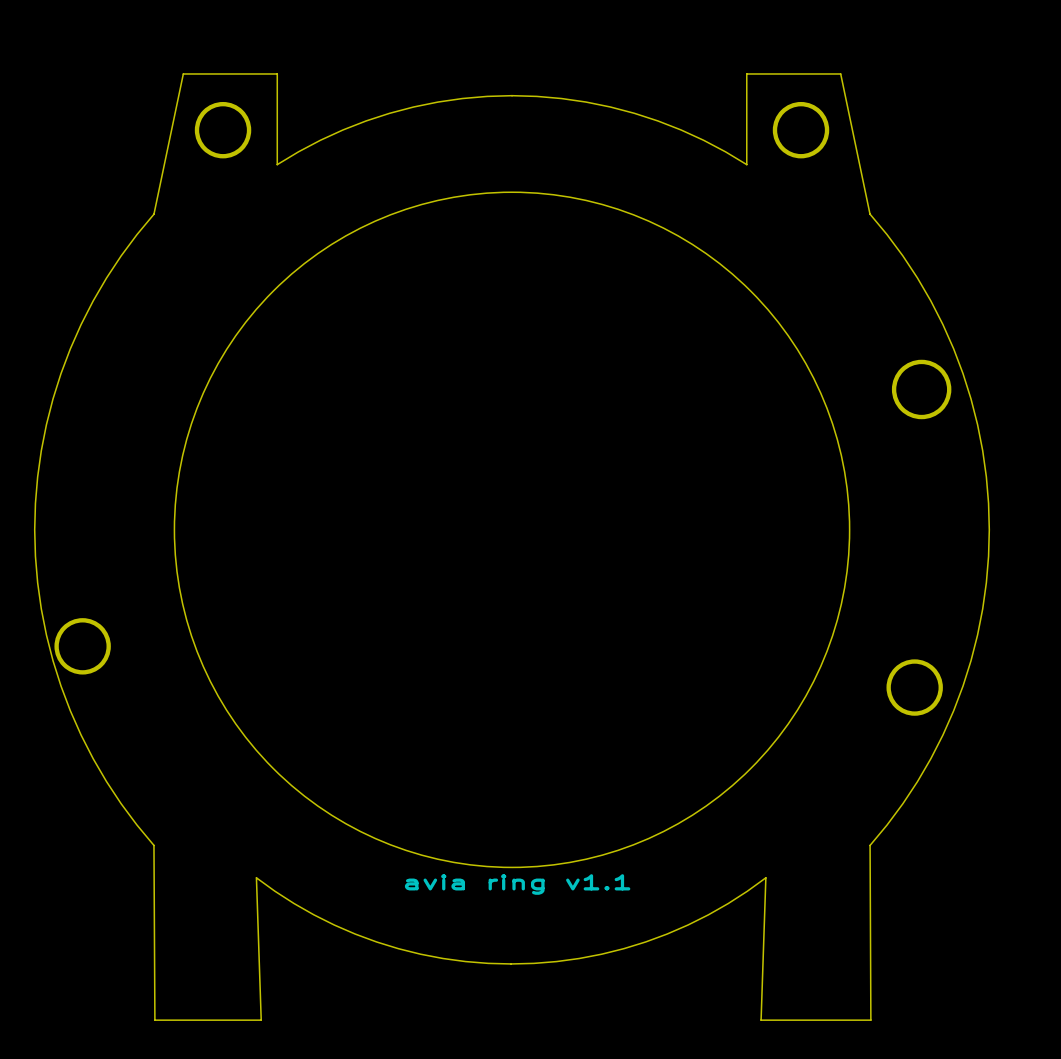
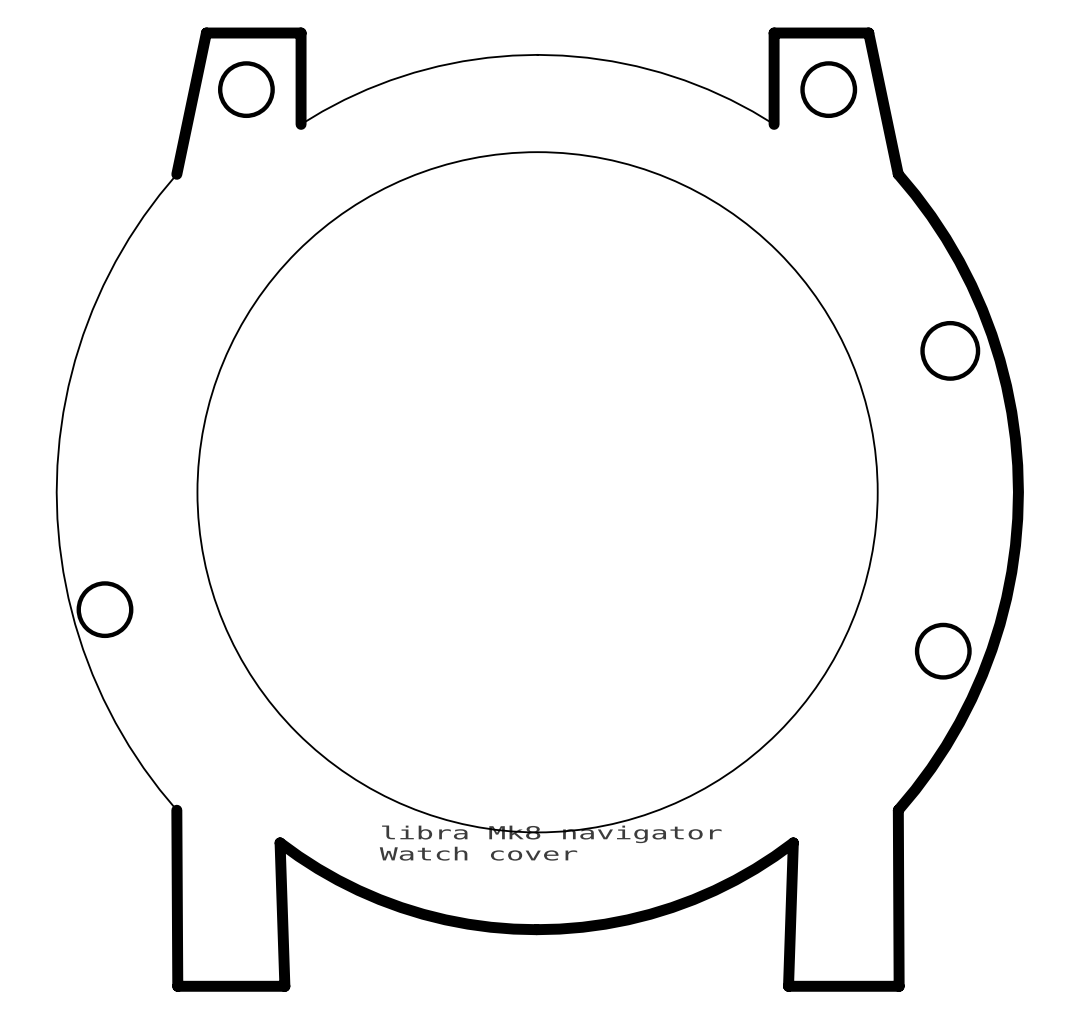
board edge width: thin (277, 164) (277, 73) (183, 73) (153, 214) -> thick (301, 124) (301, 33) (206, 33) (176, 174)
board edge width: thin (746, 164) (746, 73) (840, 73) (870, 214) (917, 277) (942, 324) (970, 398) (982, 450) (988, 503) (988, 556) (982, 608) (971, 660) (953, 710) (930, 758) (902, 803) (870, 845) (870, 1020) (761, 1020) (765, 877) (708, 914) (645, 941) (579, 958) (511, 963) (443, 958) (376, 941) (313, 914) (256, 877) (261, 1020) (154, 1020) (153, 845) -> thick (774, 124) (774, 33) (868, 33) (898, 174) (946, 238) (971, 285) (1000, 360) (1011, 412) (1017, 465) (1017, 518) (1011, 572) (1000, 624) (982, 674) (959, 722) (931, 768) (898, 810) (899, 986) (788, 986) (793, 842) (735, 880) (672, 907) (605, 924) (536, 929) (468, 924) (401, 907) (337, 880) (280, 842) (284, 986) (177, 986) (176, 810)
text: none -> libra Mk8 navigator (551, 834)
text: avia ring v1.1 (517, 884) -> none
text: none -> Watch cover (478, 853)

